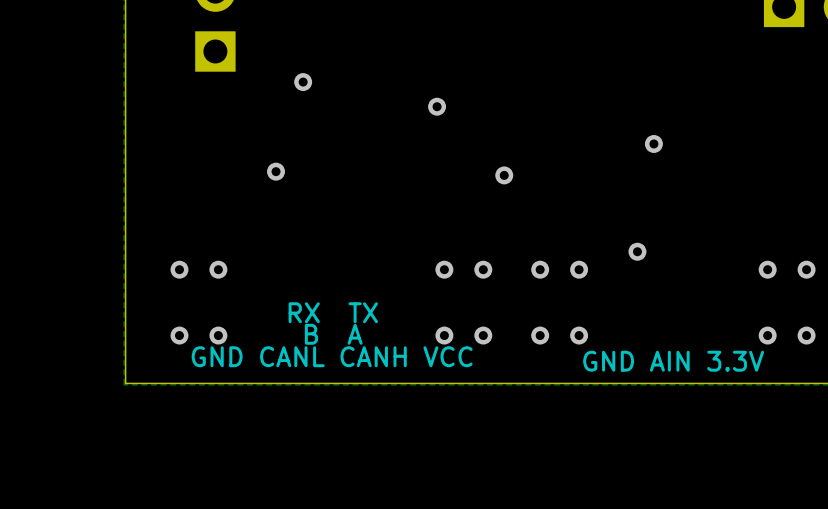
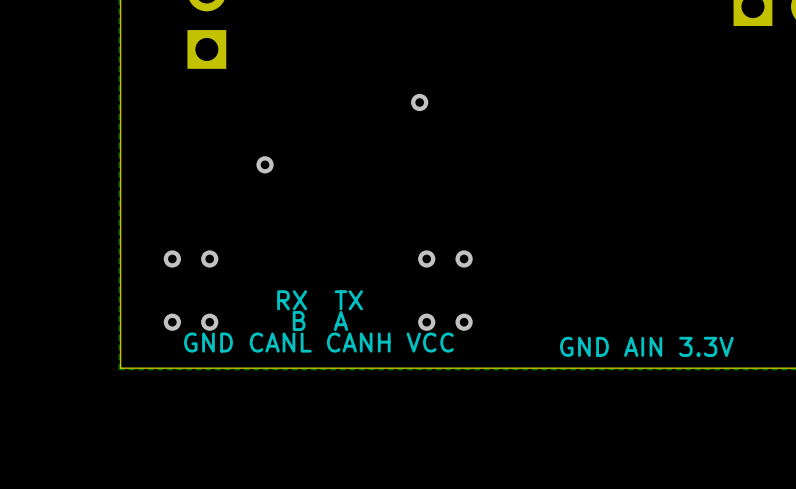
via: (303, 82) -> none
via: (653, 143) -> none
via: (504, 175) -> none
via: (637, 251) -> none
via: (540, 269) -> none
via: (579, 269) -> none
via: (767, 269) -> none
via: (806, 269) -> none
via: (540, 335) -> none
via: (579, 335) -> none
via: (767, 335) -> none
via: (806, 335) -> none

